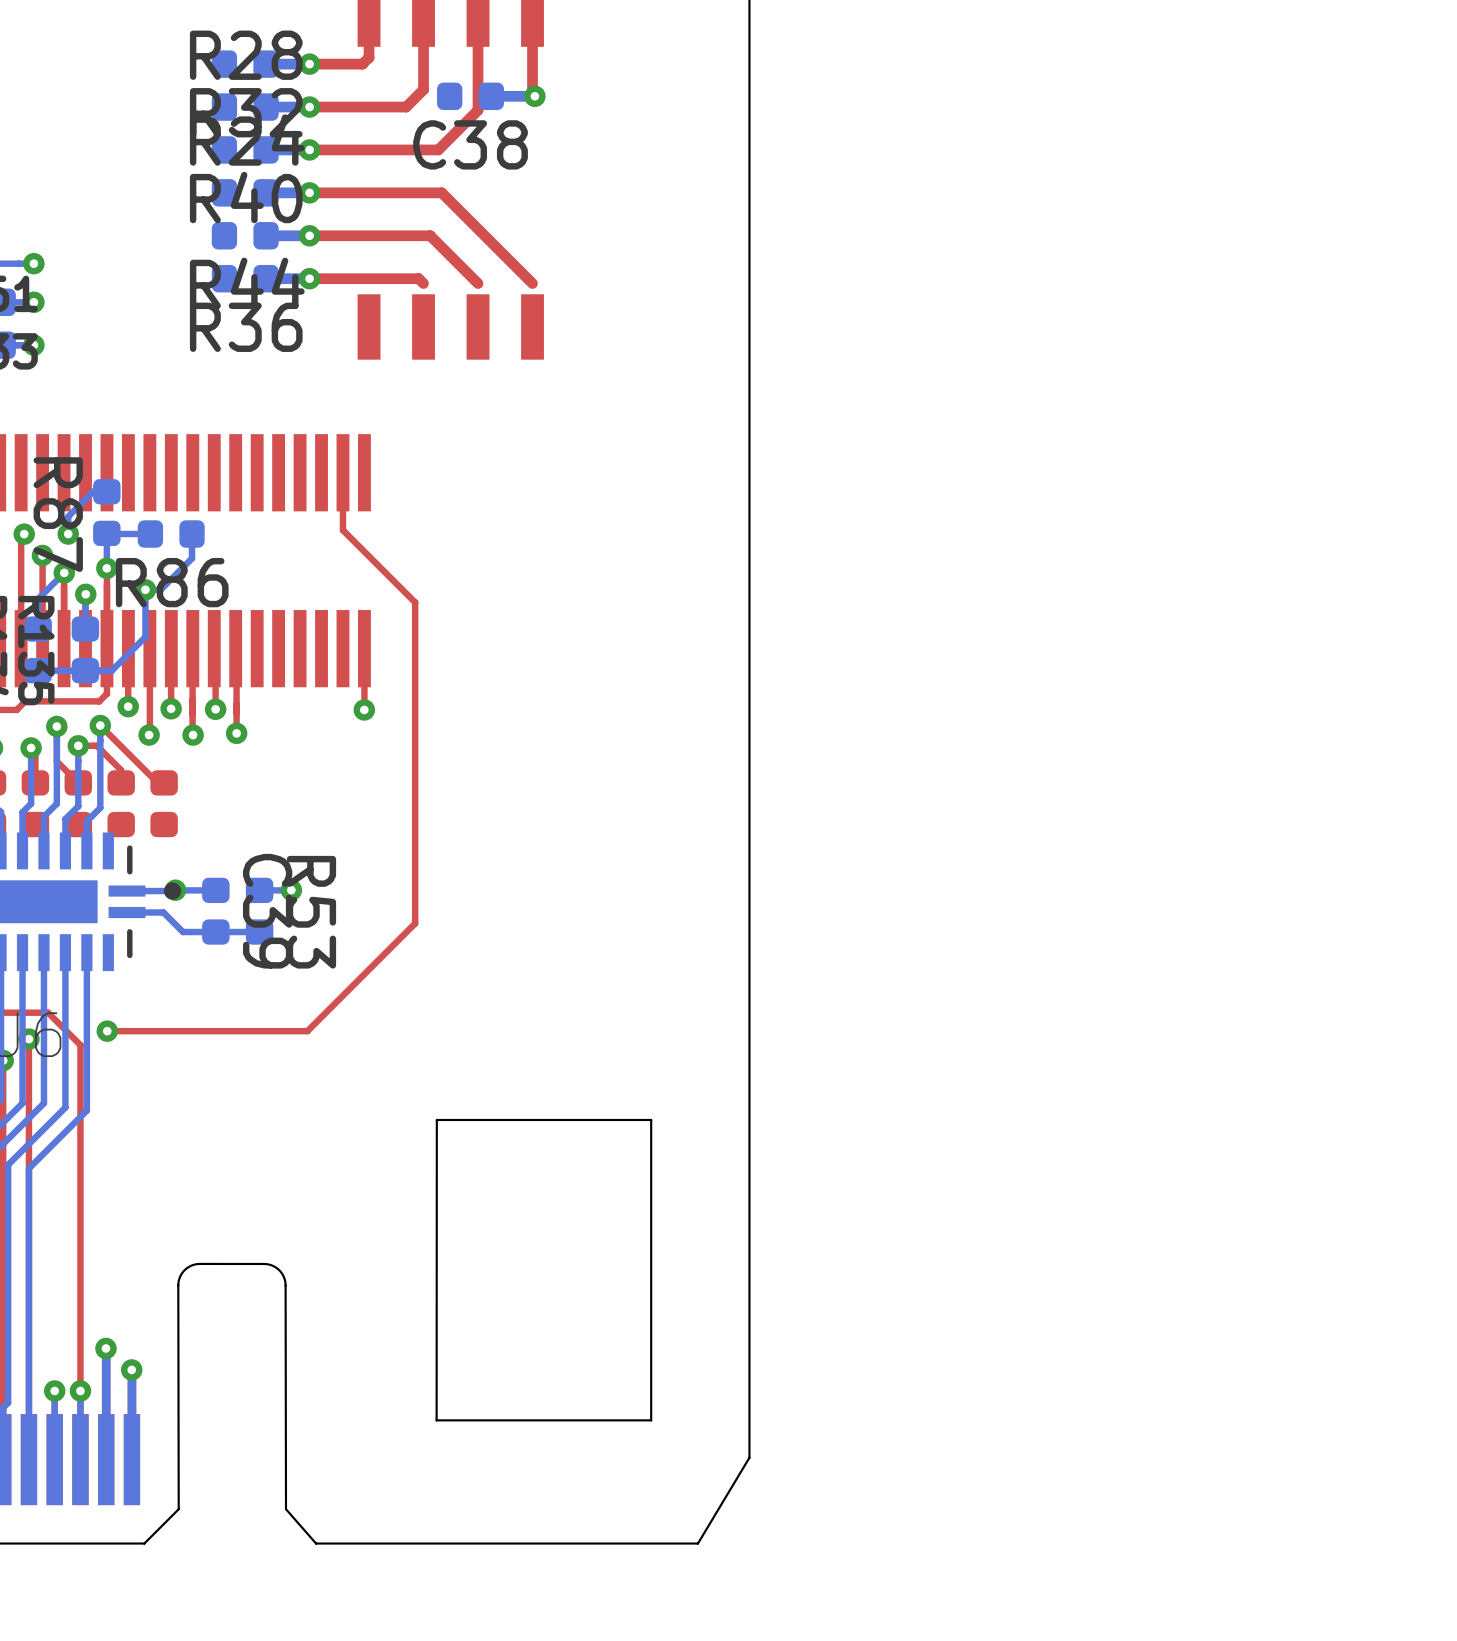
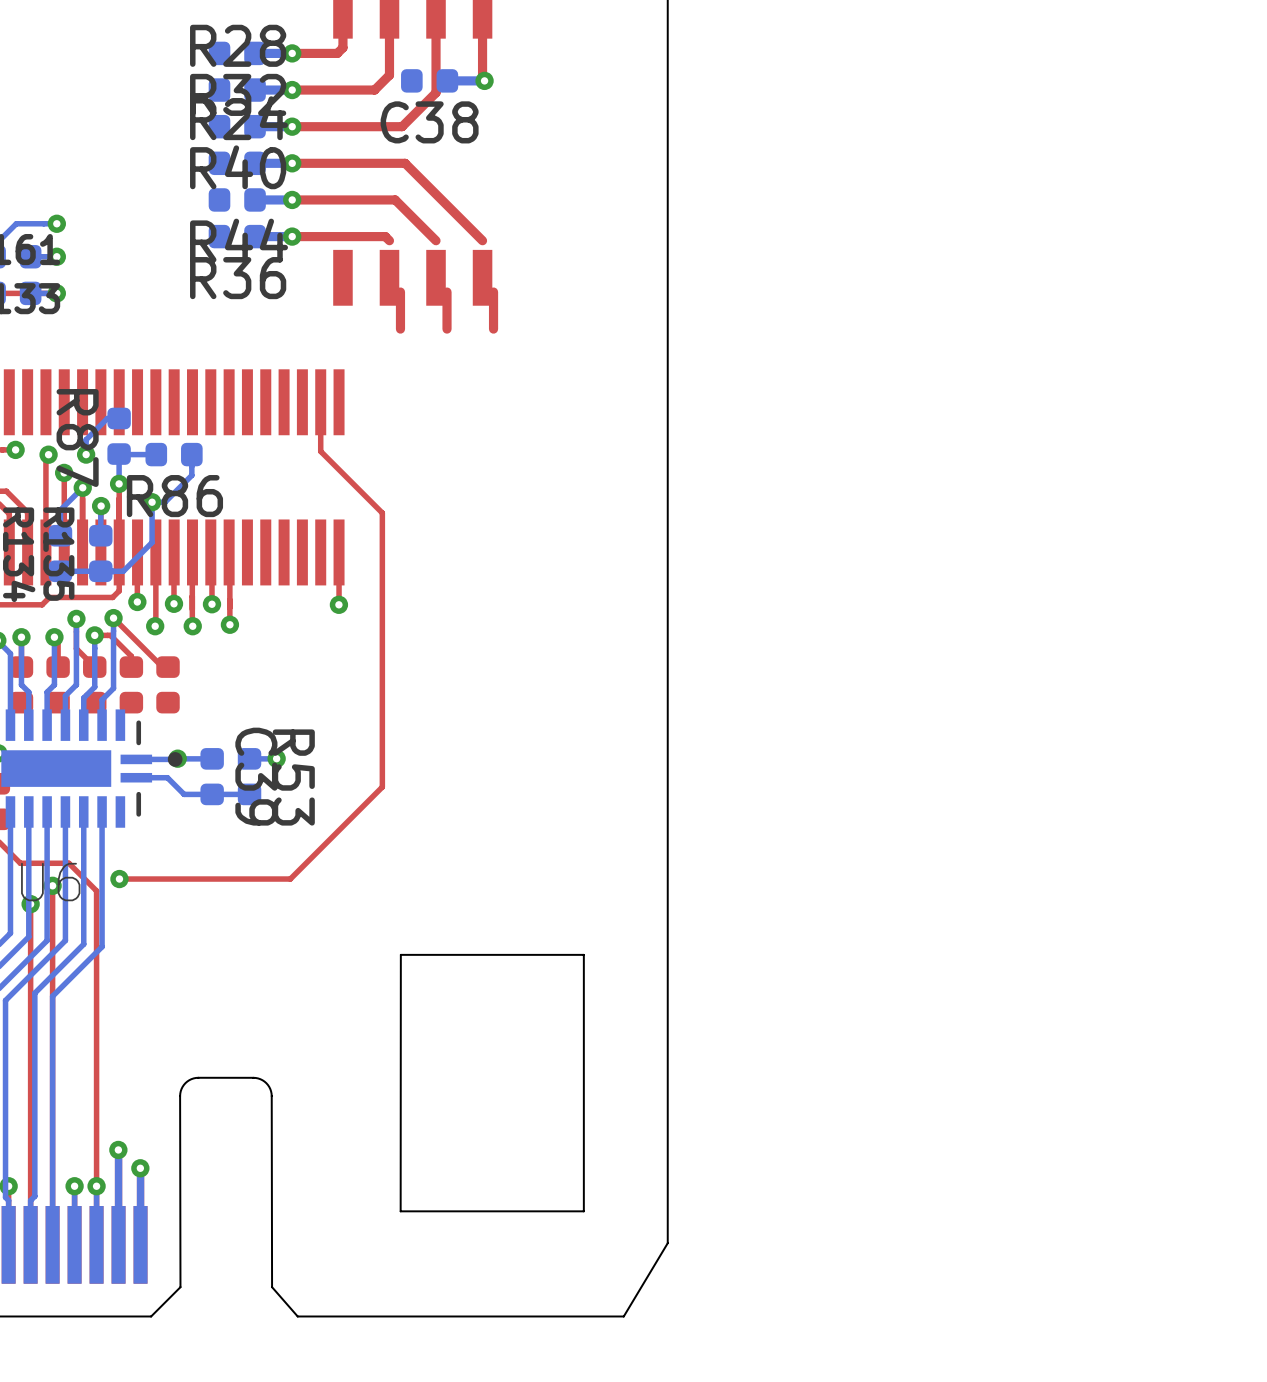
top track: none -> (400, 292) (400, 329)
top track: none -> (447, 292) (447, 329)
top track: none -> (493, 292) (493, 329)

